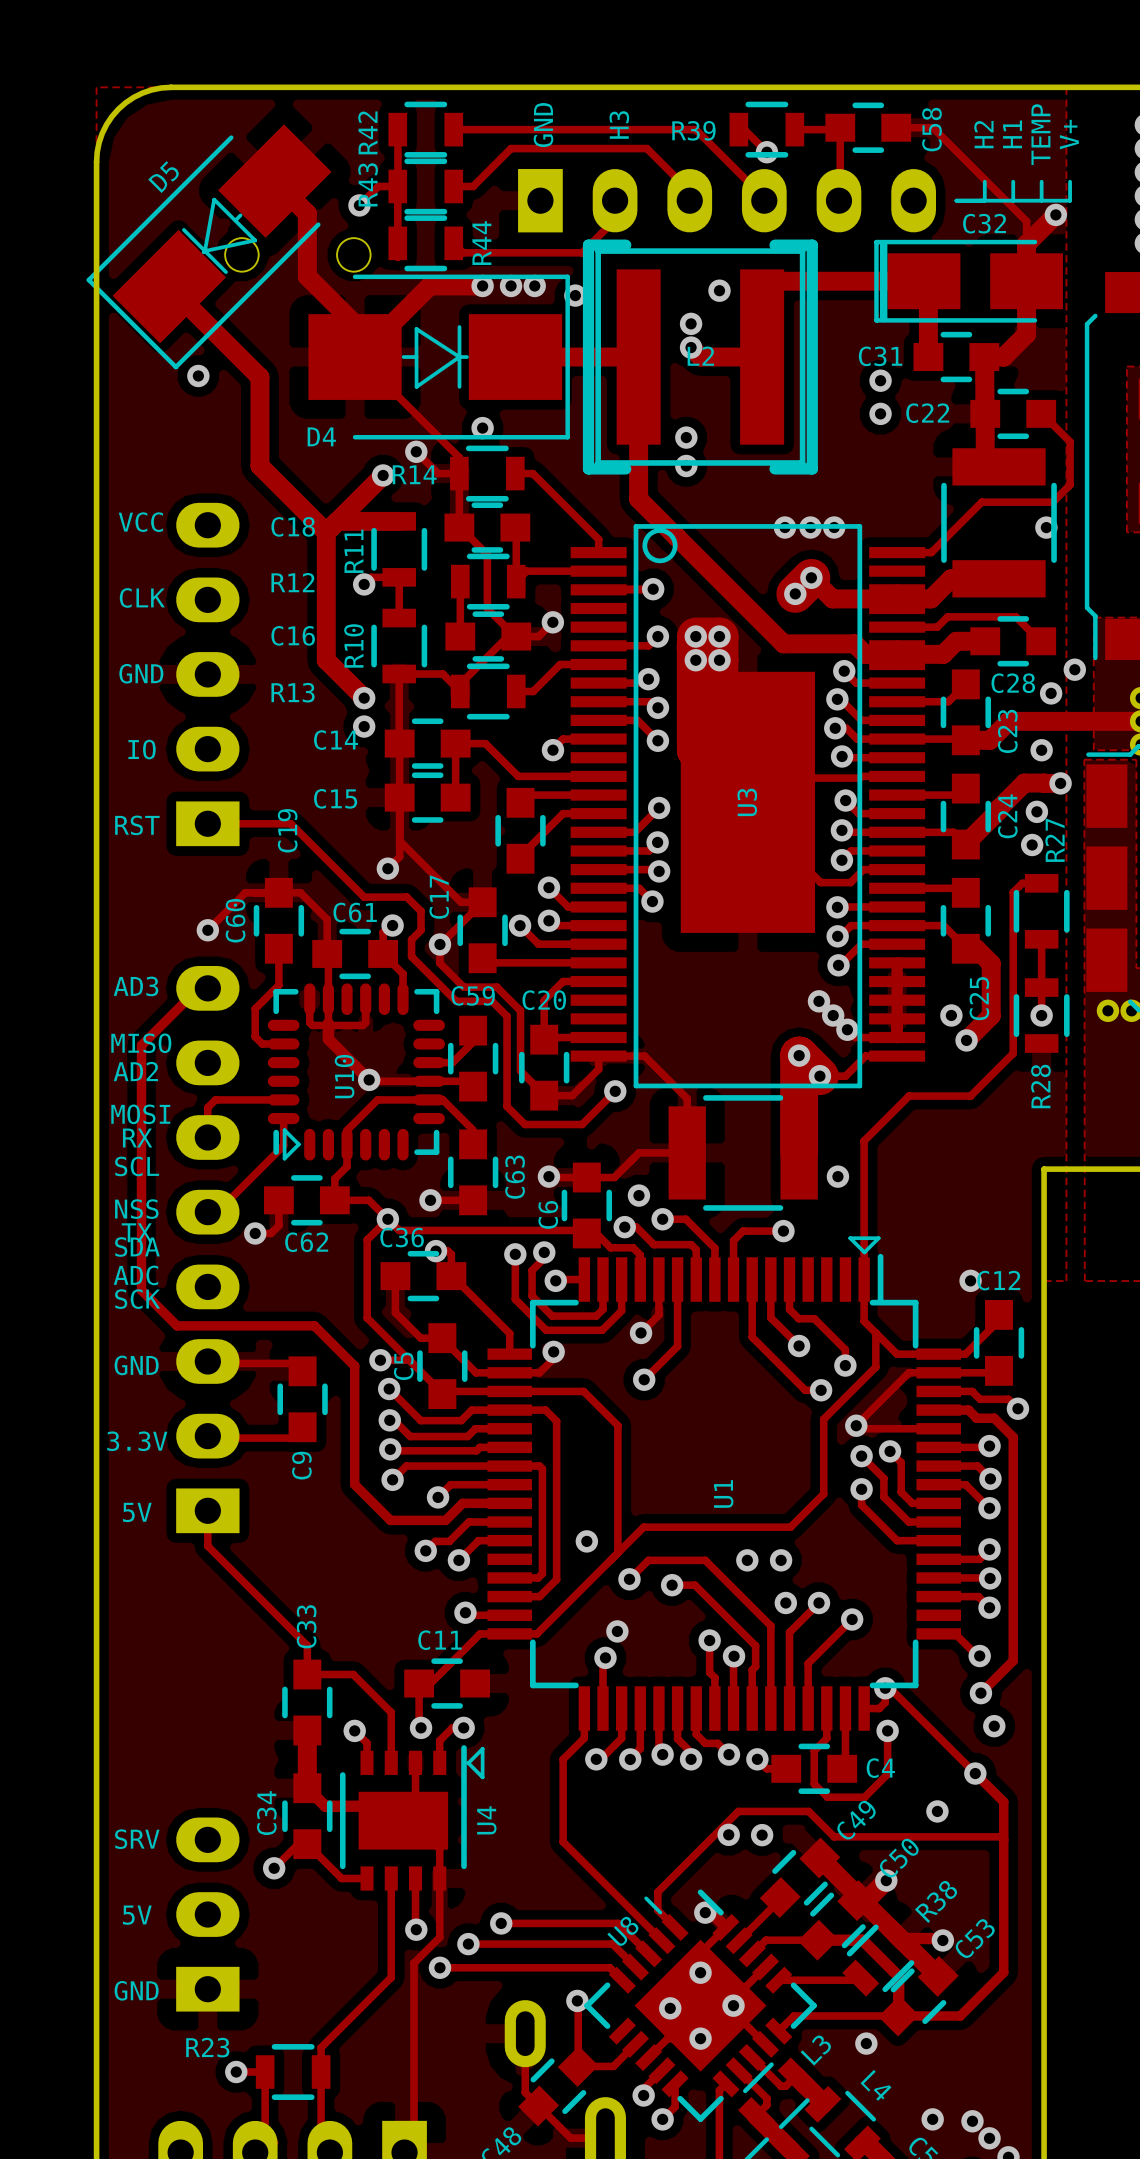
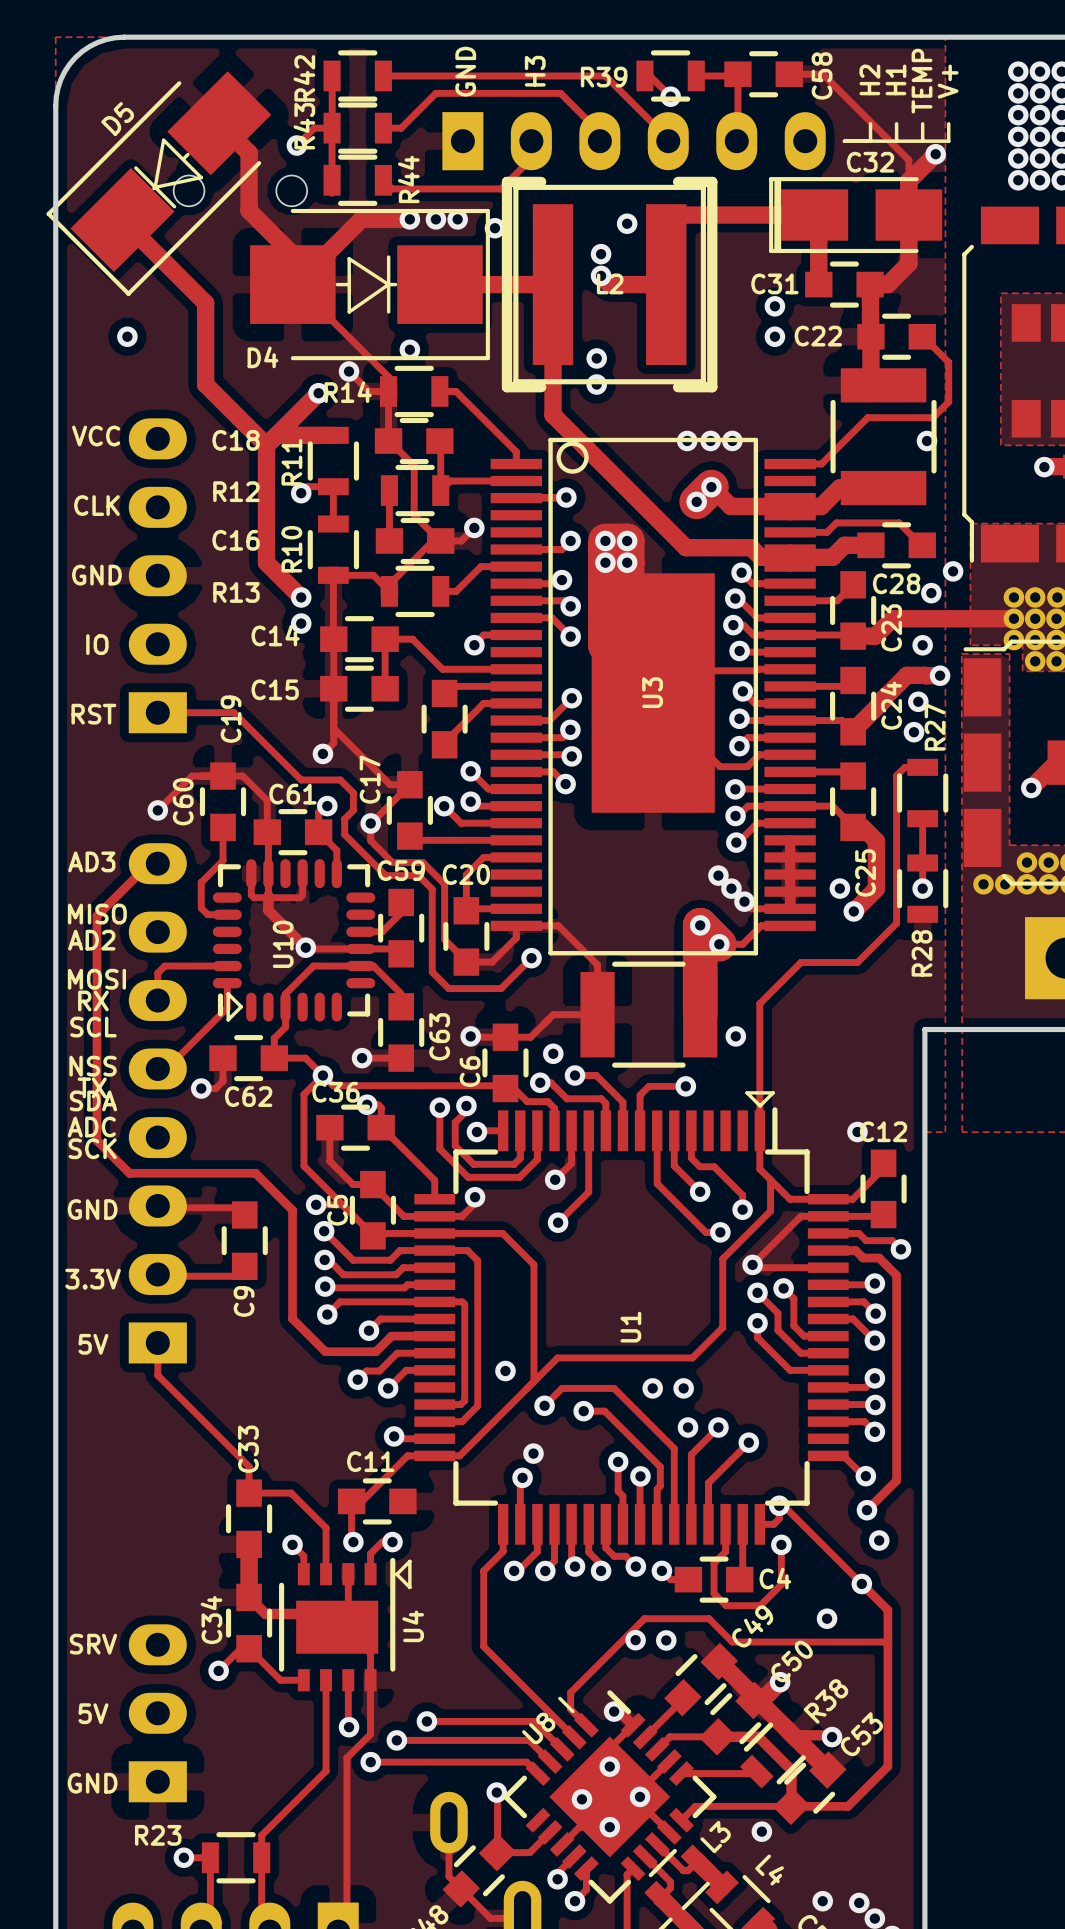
via position: (198, 375) -> (127, 336)

